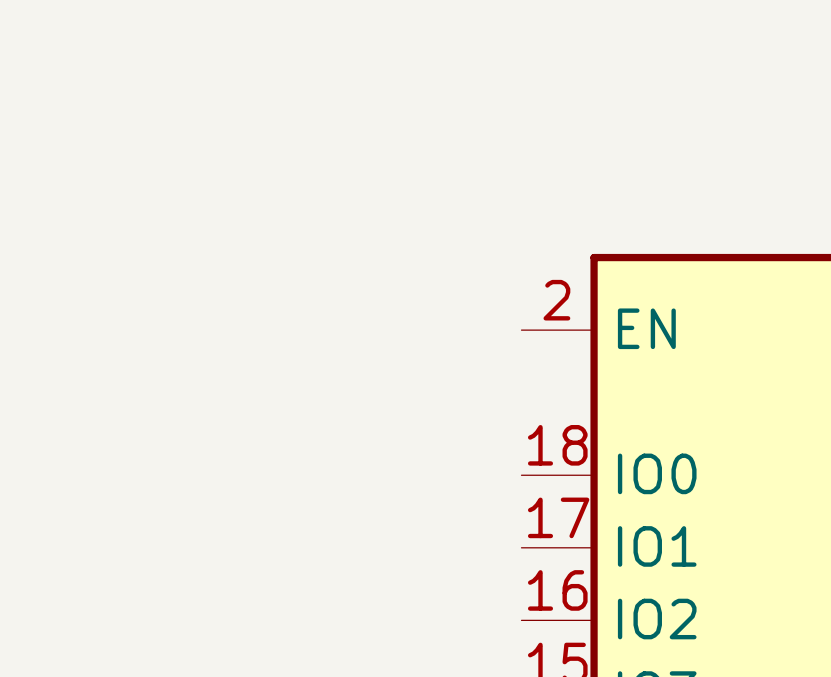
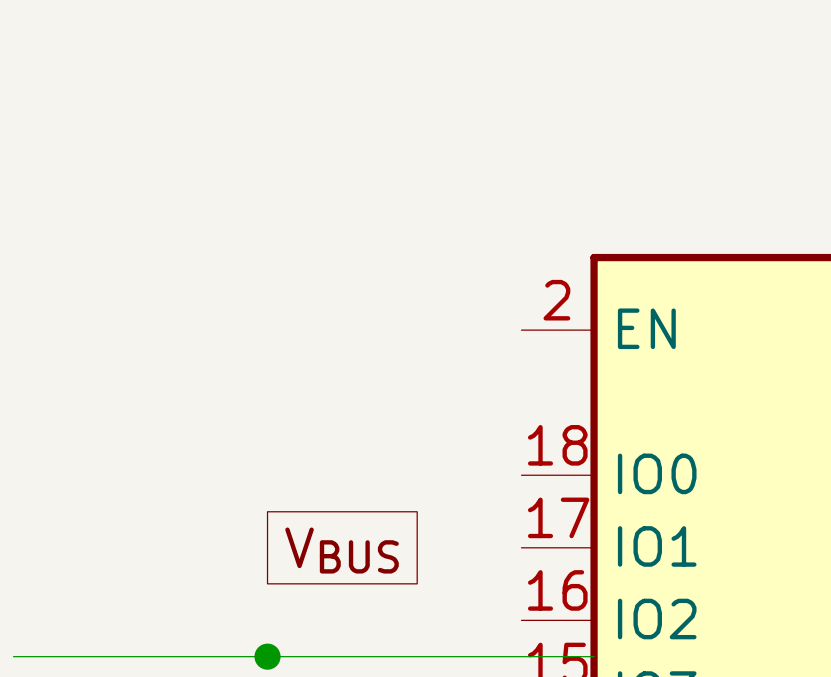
global label: none -> VBUS (342, 550)
wire: none -> (13, 656) (594, 656)
junction: none -> (267, 656)

